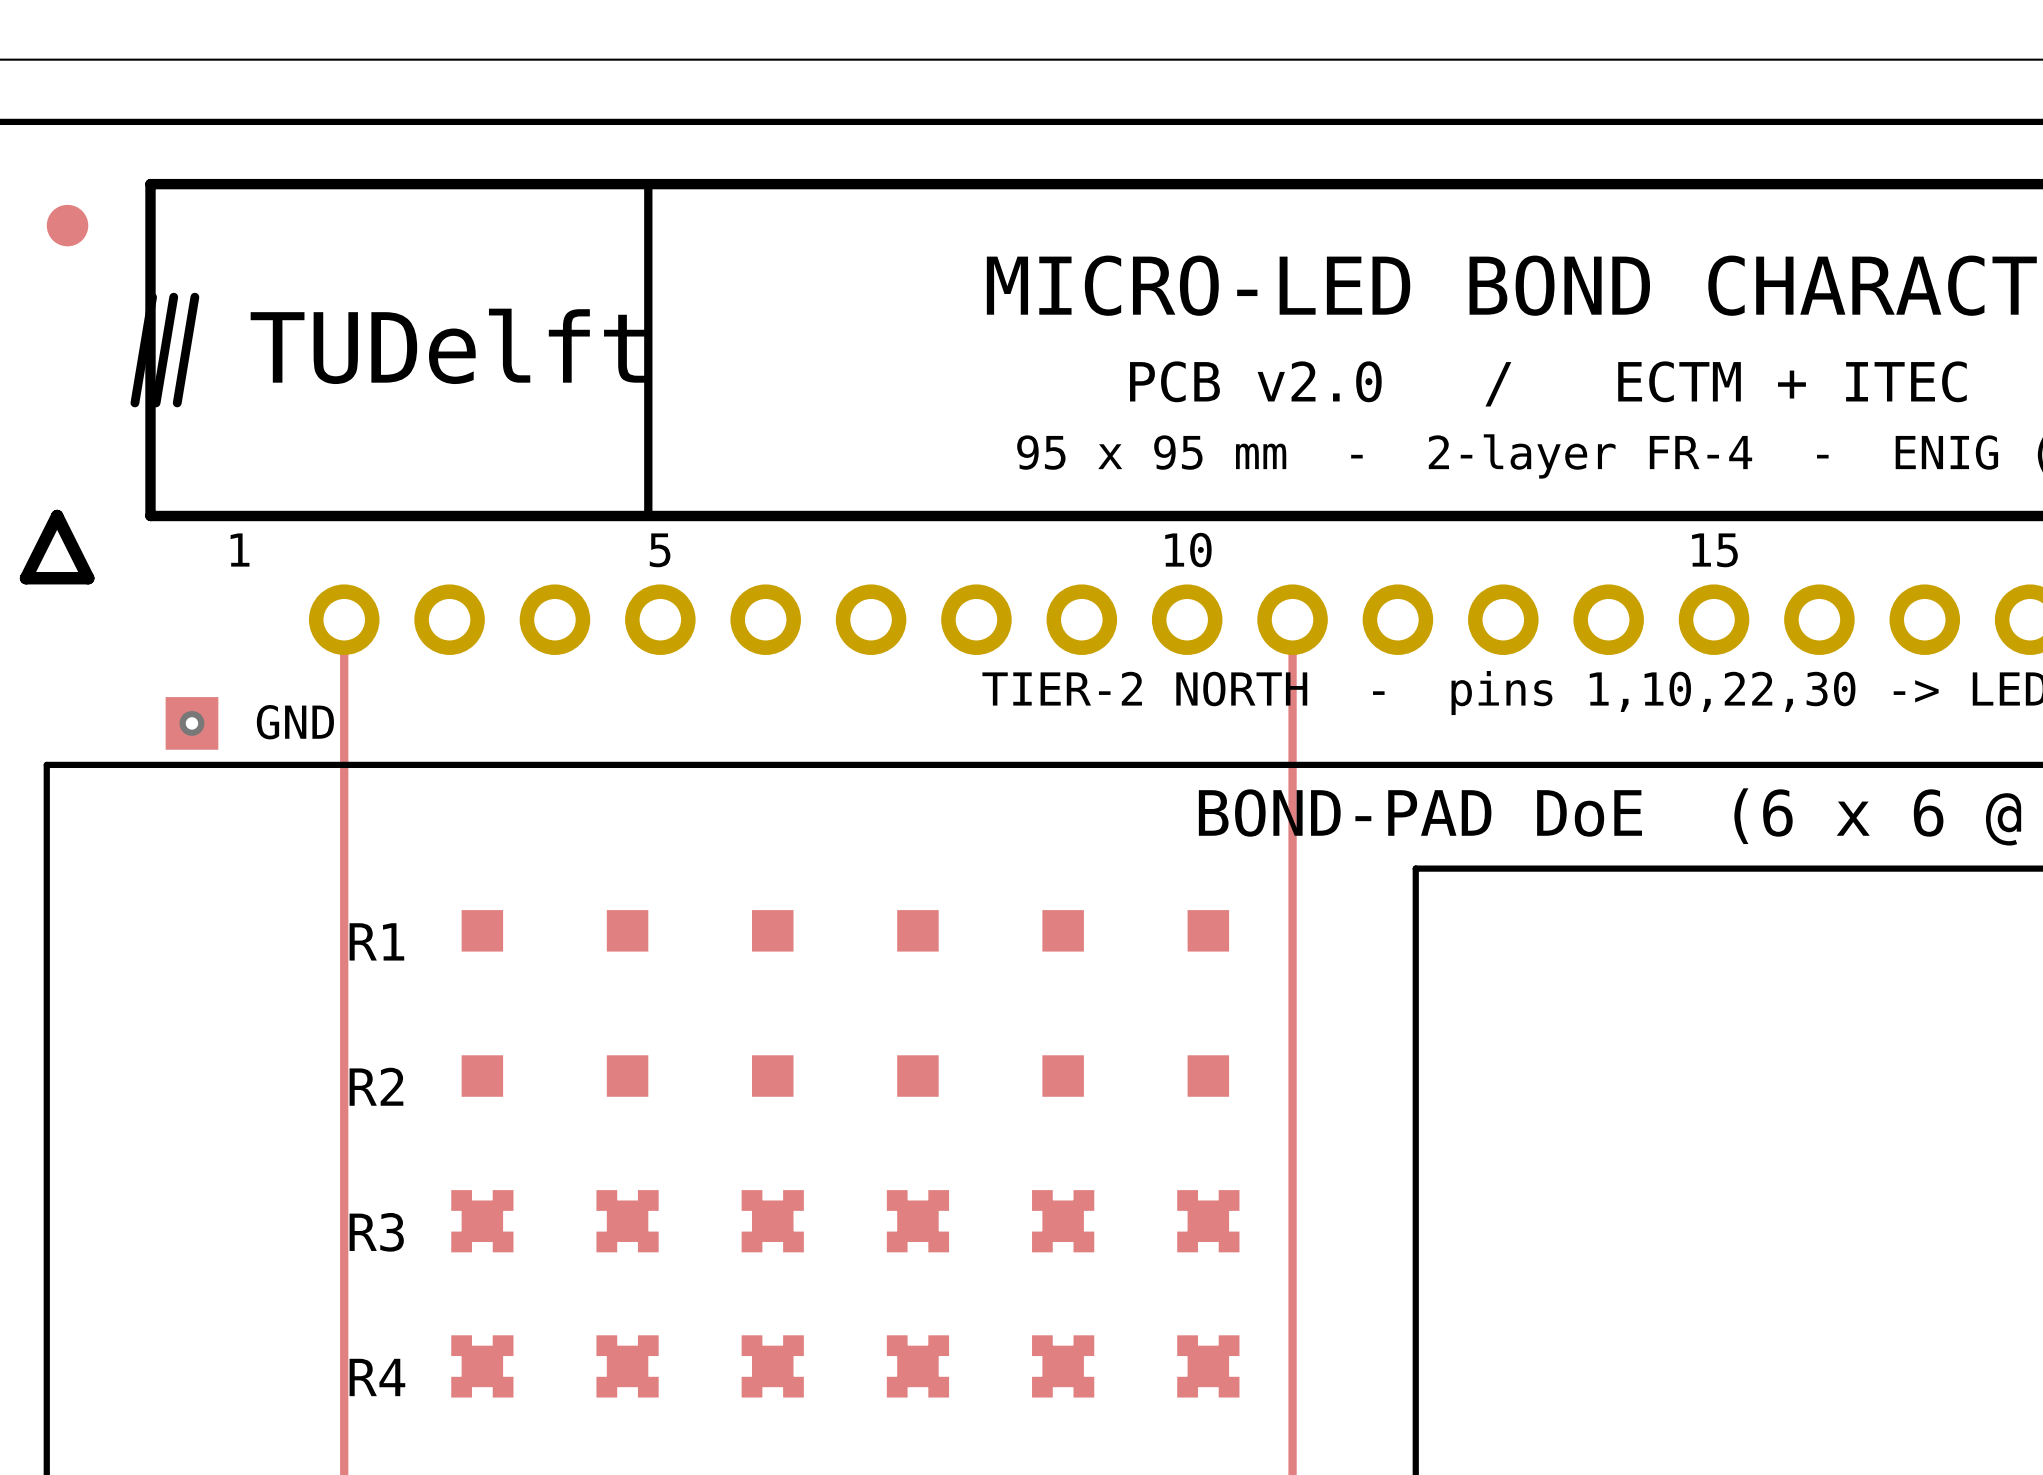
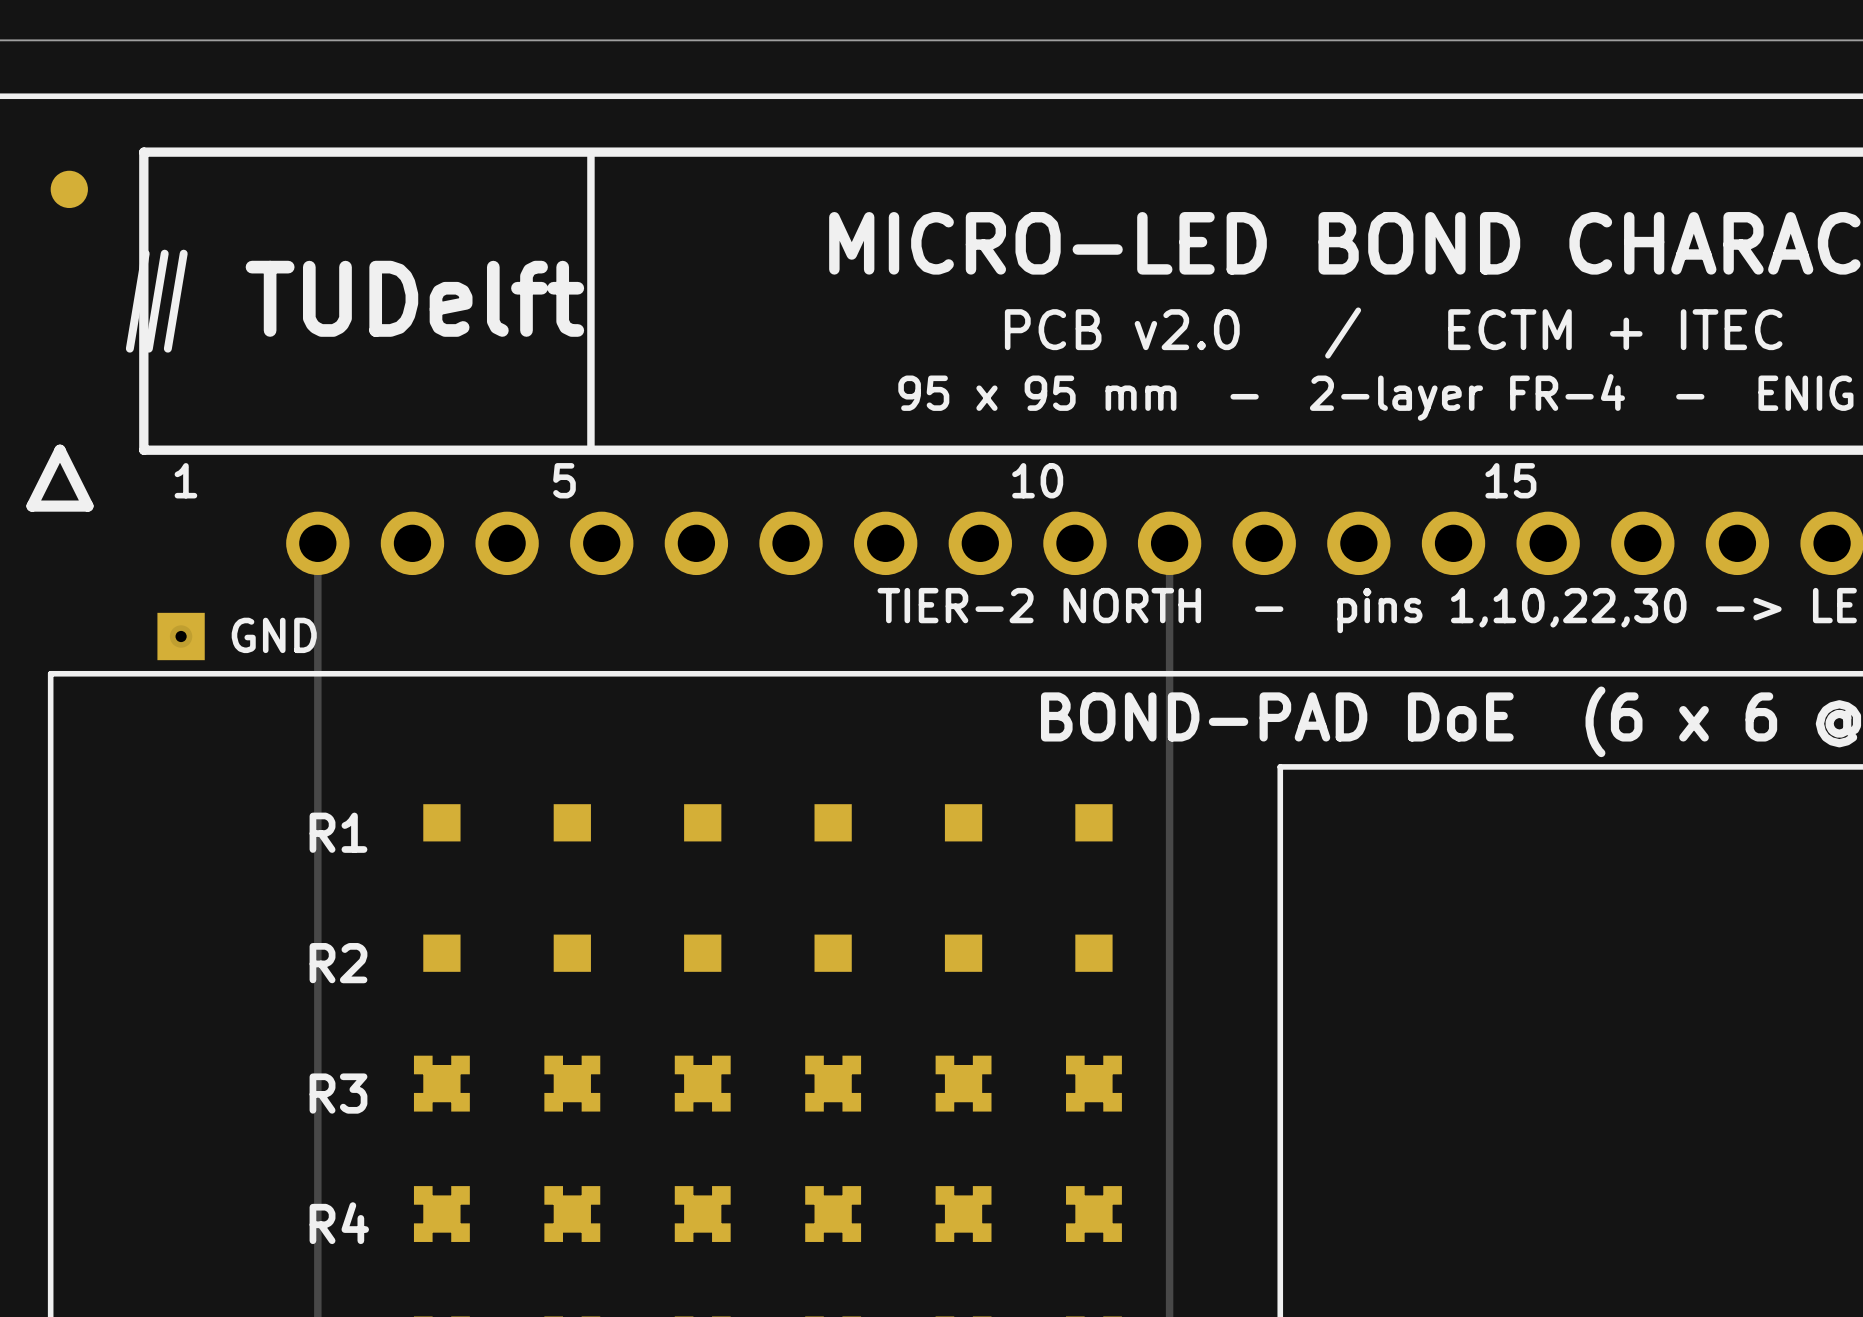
text position: 1 (240, 550) -> 1 (185, 480)
text position: 5 (660, 550) -> 5 (564, 480)
text position: 10 (1188, 550) -> 10 (1037, 480)
text position: 15 (1714, 550) -> 15 (1510, 480)

